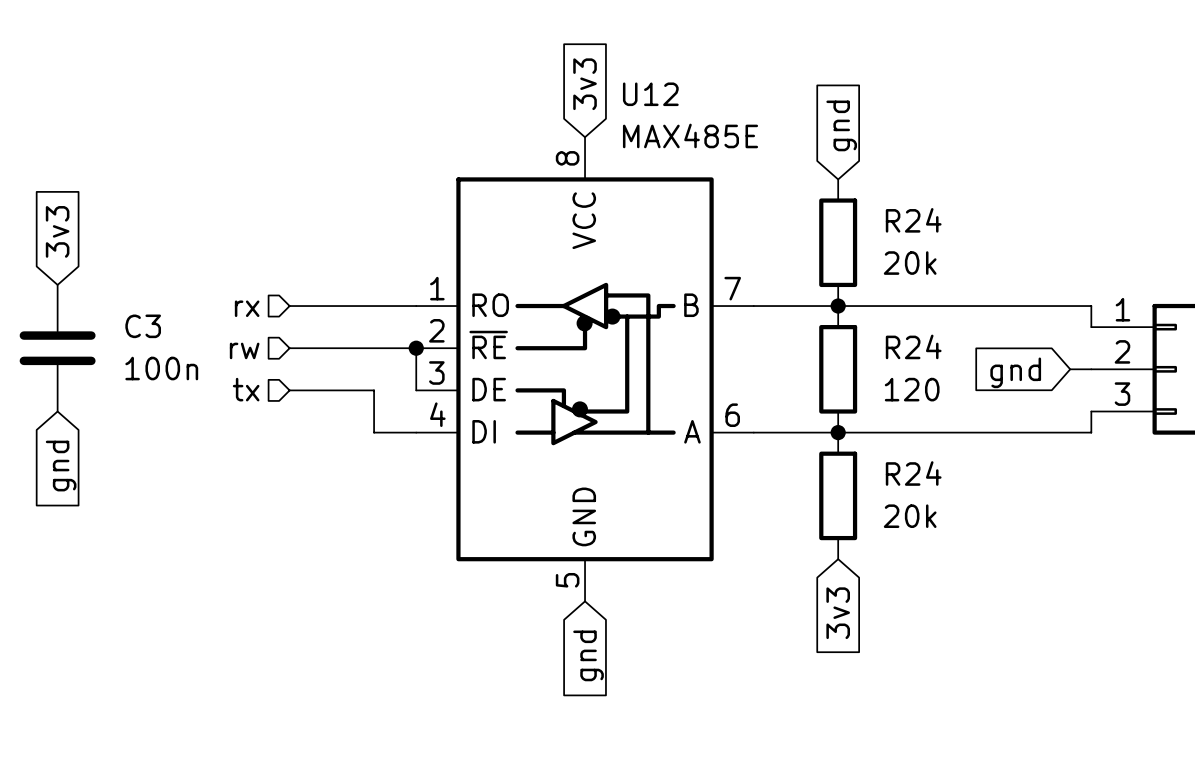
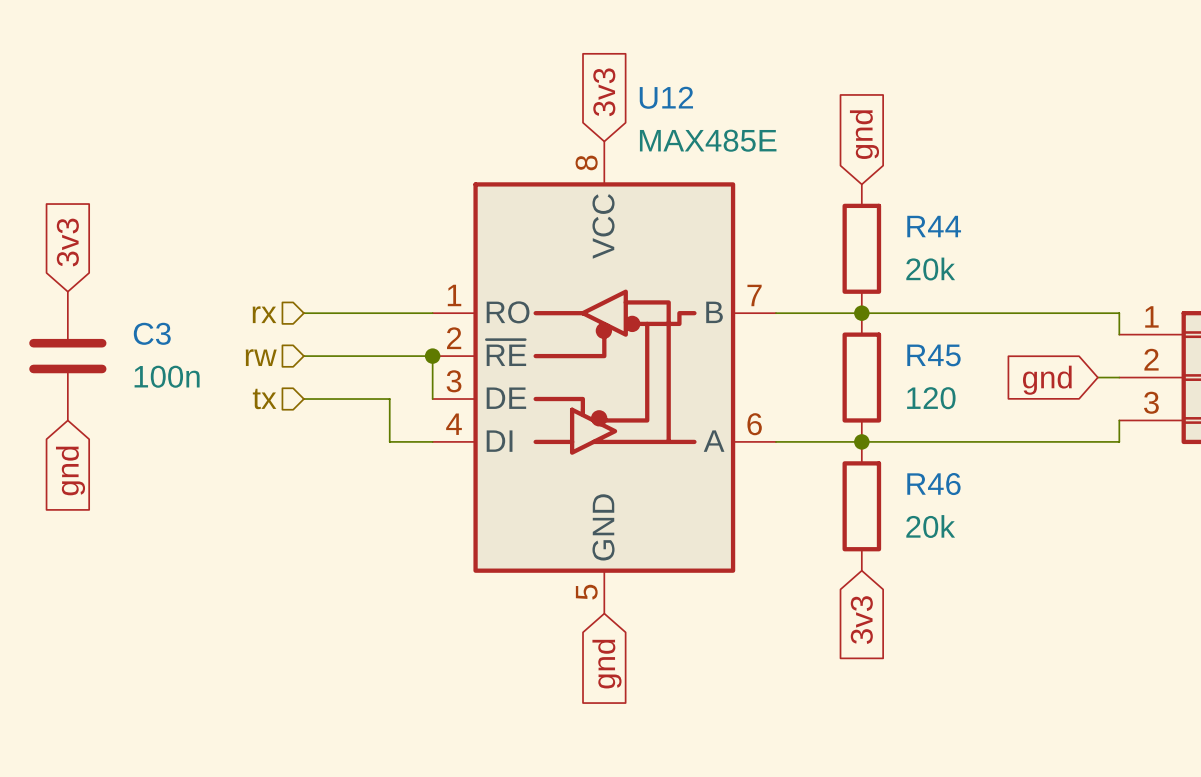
R24 name: R24 (913, 220) -> R44 (934, 226)
R24 name: R24 (913, 346) -> R45 (933, 355)
R24 name: R24 (913, 473) -> R46 (933, 484)

